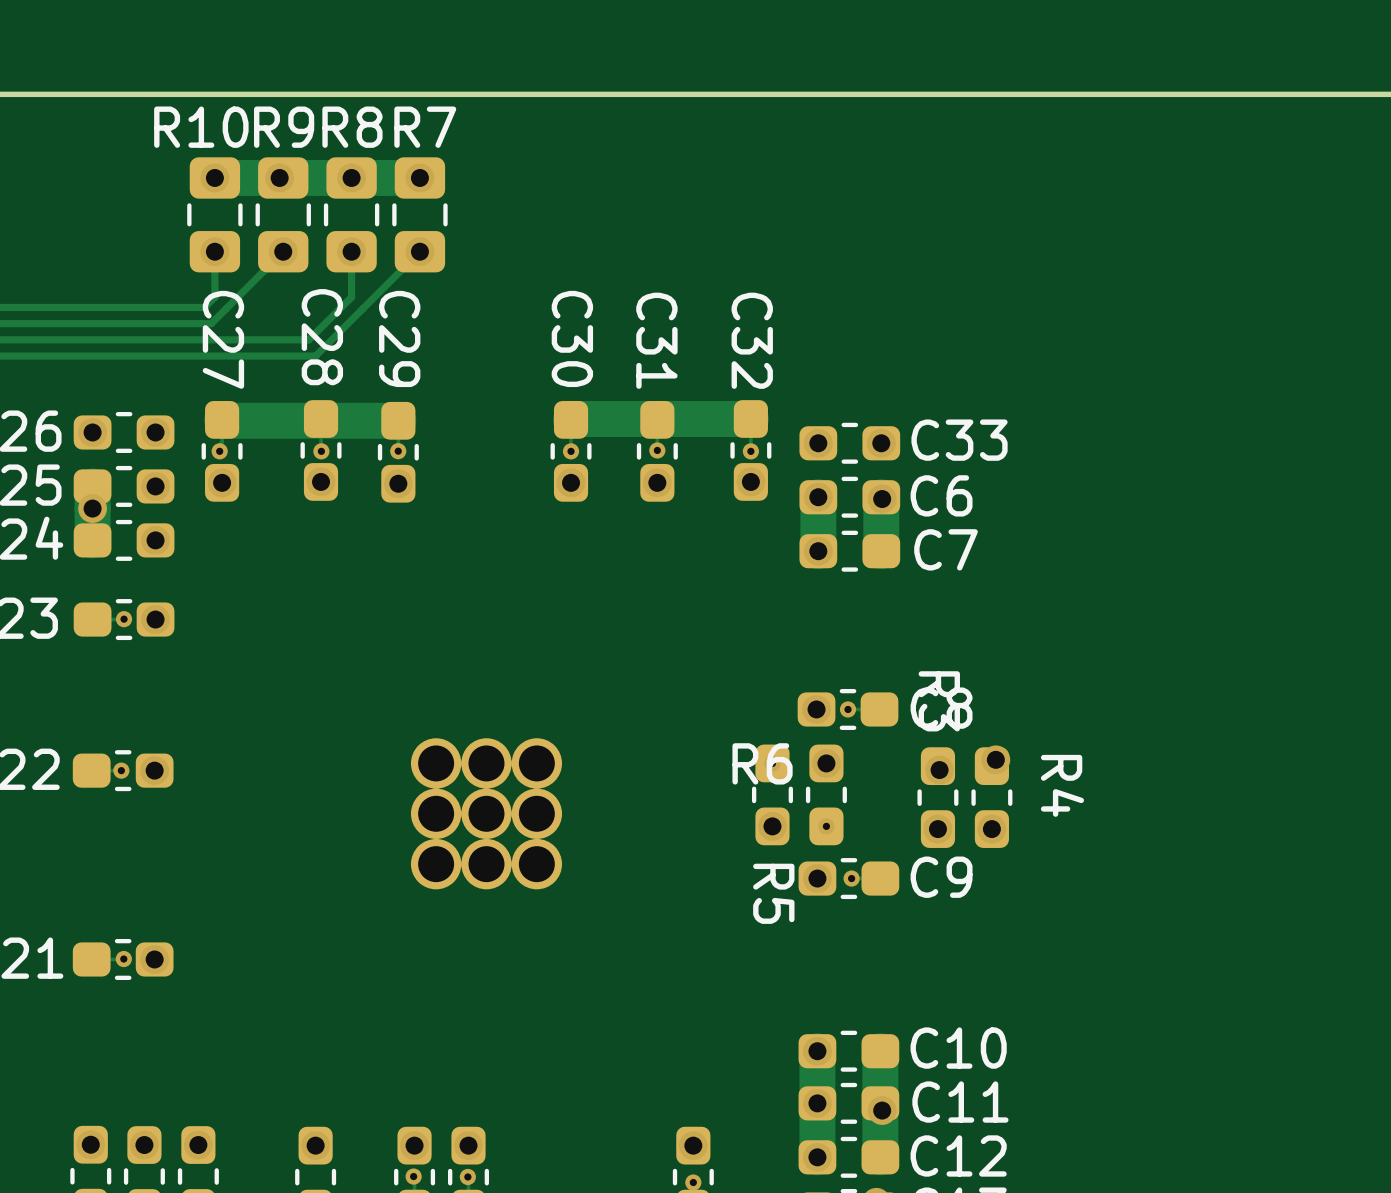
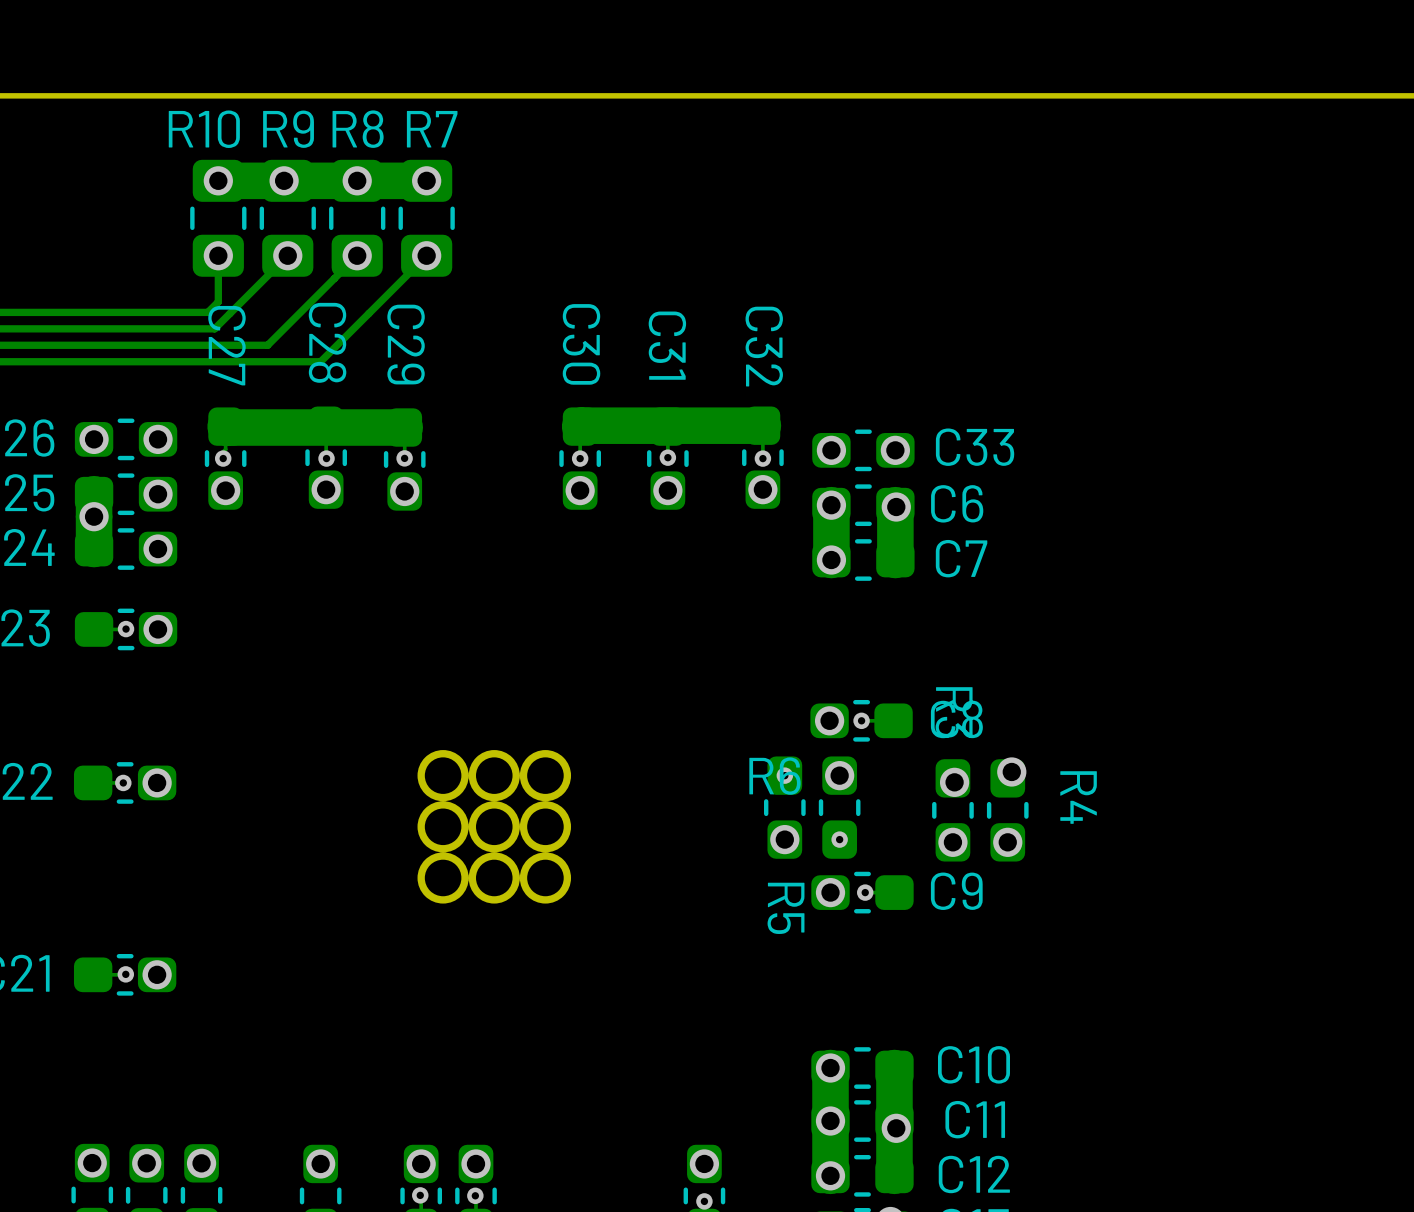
track: (351, 251) (351, 297) (308, 339) (263, 339) -> (357, 255) (267, 345)

